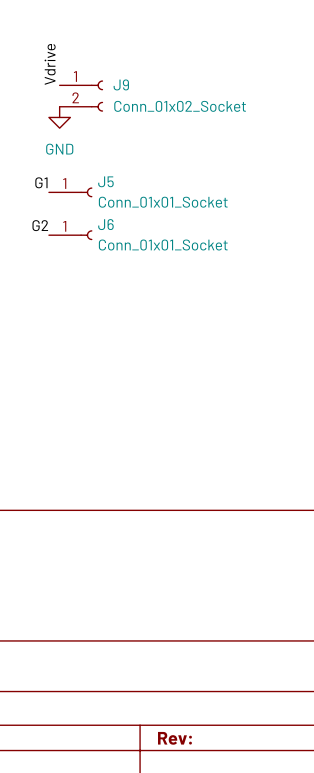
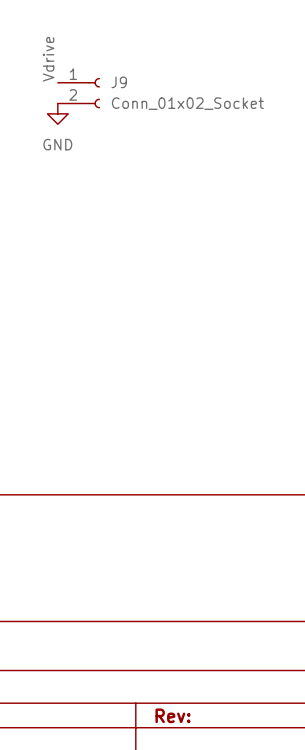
label: G1 (41, 182) -> none
J5: Conn_01x01_Socket (70, 192) -> none
label: G2 (40, 225) -> none
J6: Conn_01x01_Socket (70, 235) -> none

